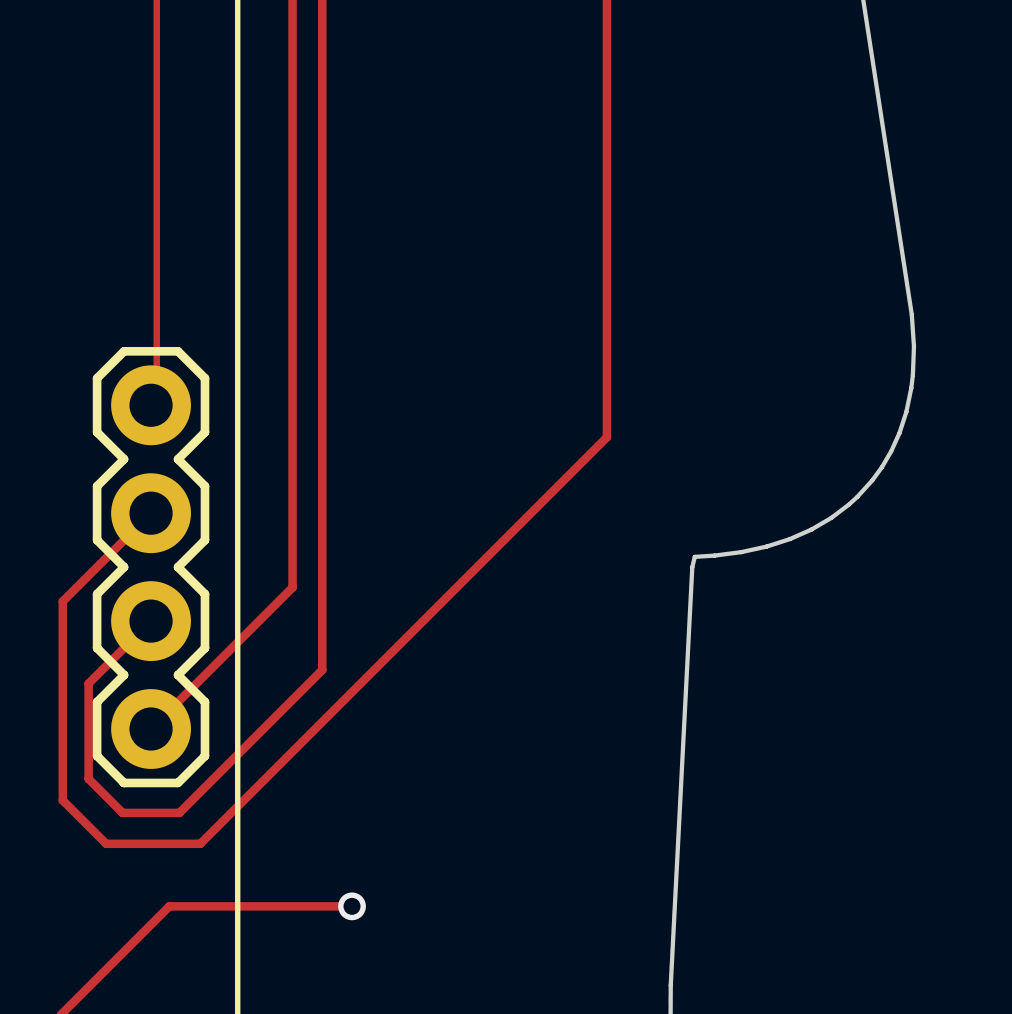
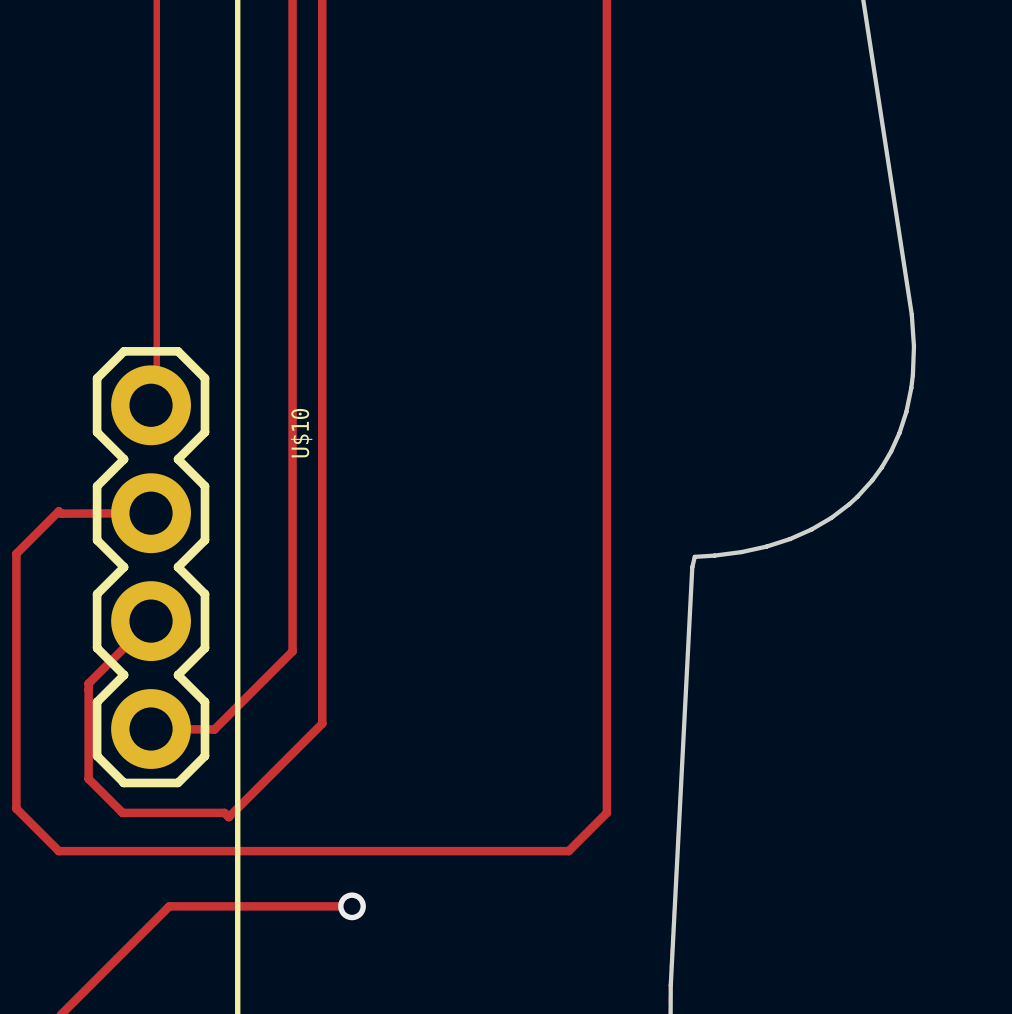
U$10 name: none -> U$10 (301, 433)
track: (606, 437) (200, 843) (106, 843) (62, 800) (62, 601) (151, 513) -> (606, 437) (606, 812) (568, 851) (58, 851) (16, 808) (16, 553) (58, 511) (61, 513) (151, 513)
track: (292, 587) (151, 729) -> (292, 587) (292, 651) (214, 729) (151, 729)
track: (322, 670) (179, 812) -> (322, 670) (322, 723) (228, 817) (224, 812) (179, 812)

